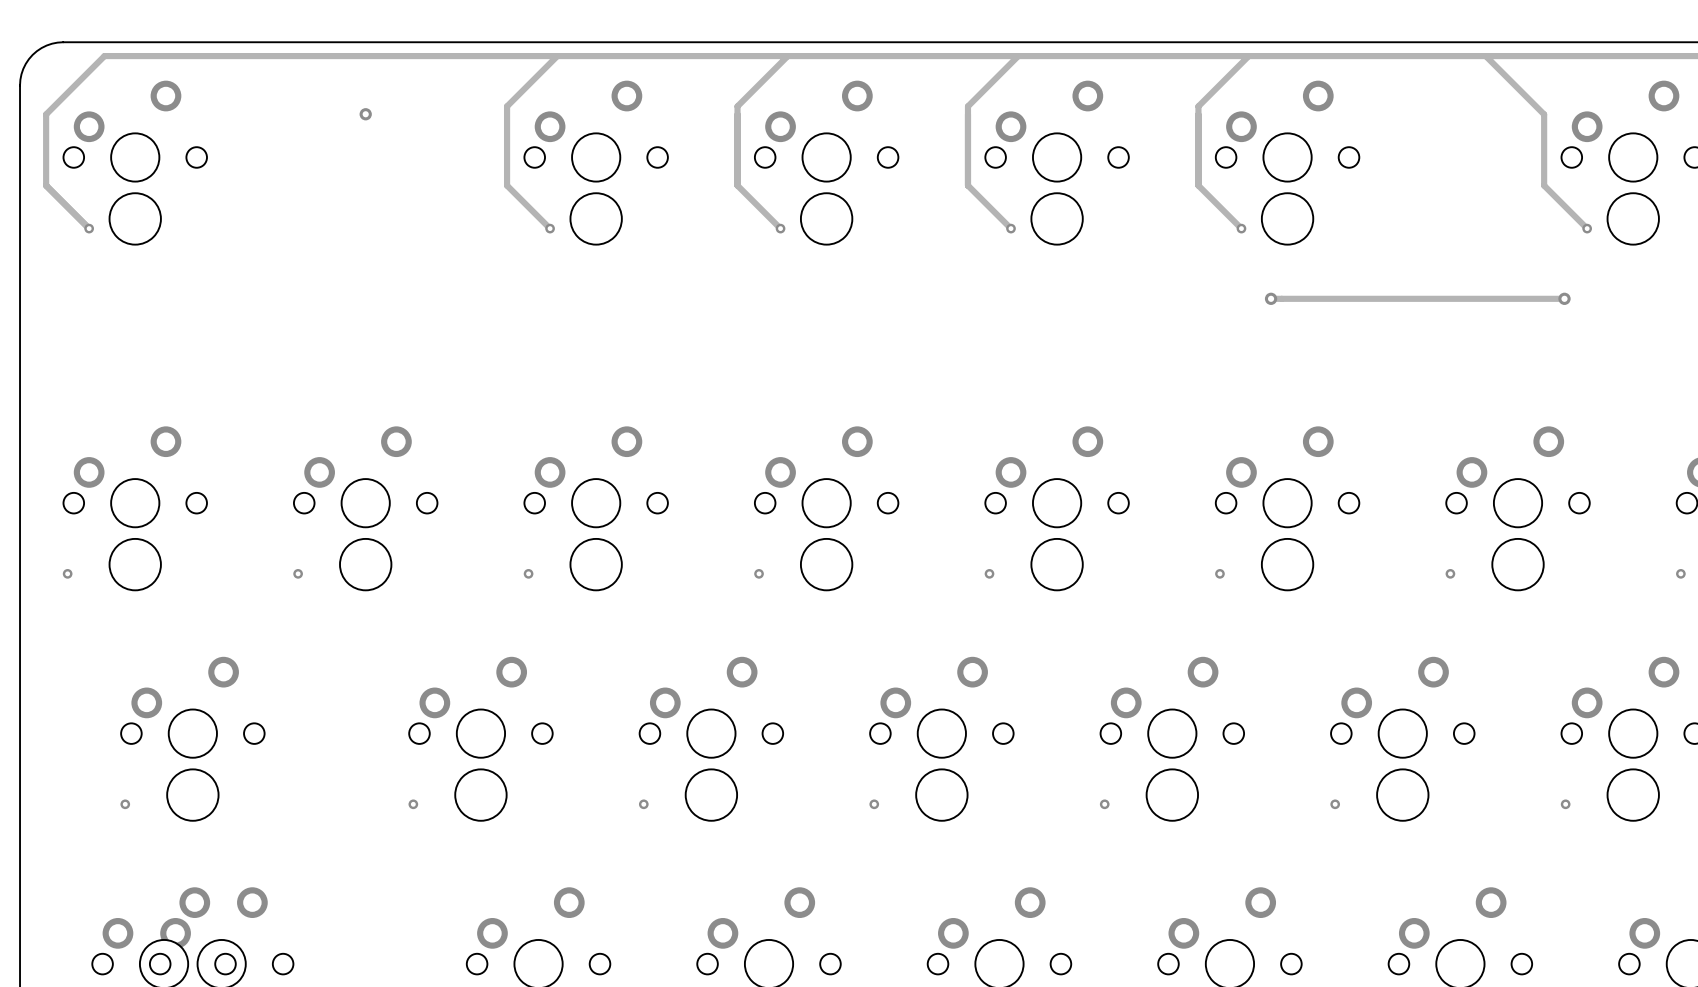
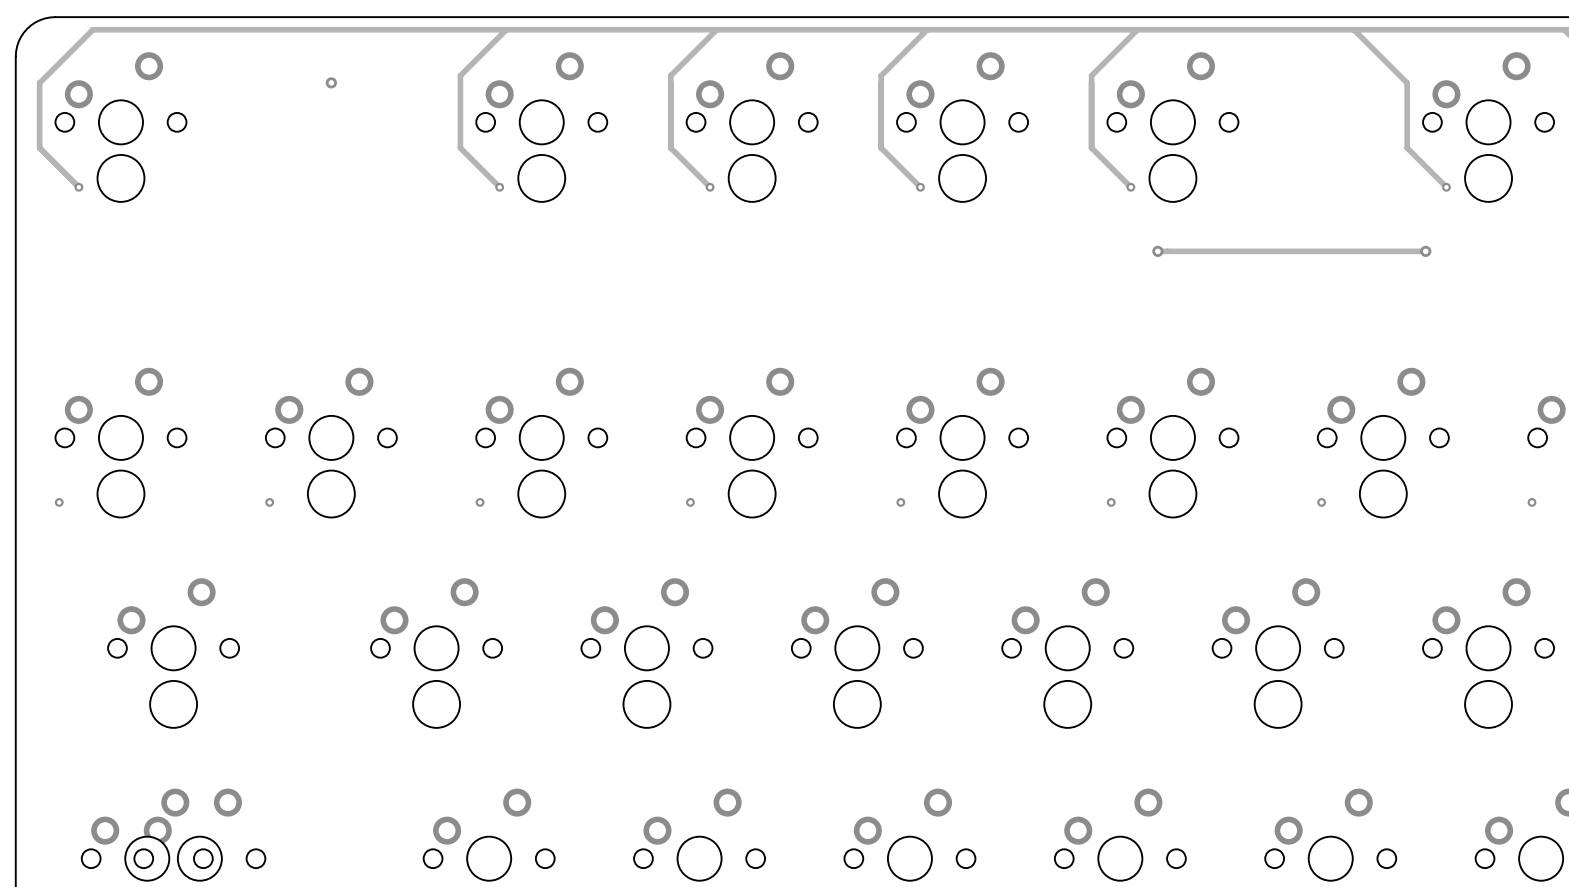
via: (125, 804) -> none
via: (413, 804) -> none
via: (643, 804) -> none
via: (874, 804) -> none
via: (1104, 804) -> none
via: (1335, 804) -> none
via: (1565, 804) -> none

